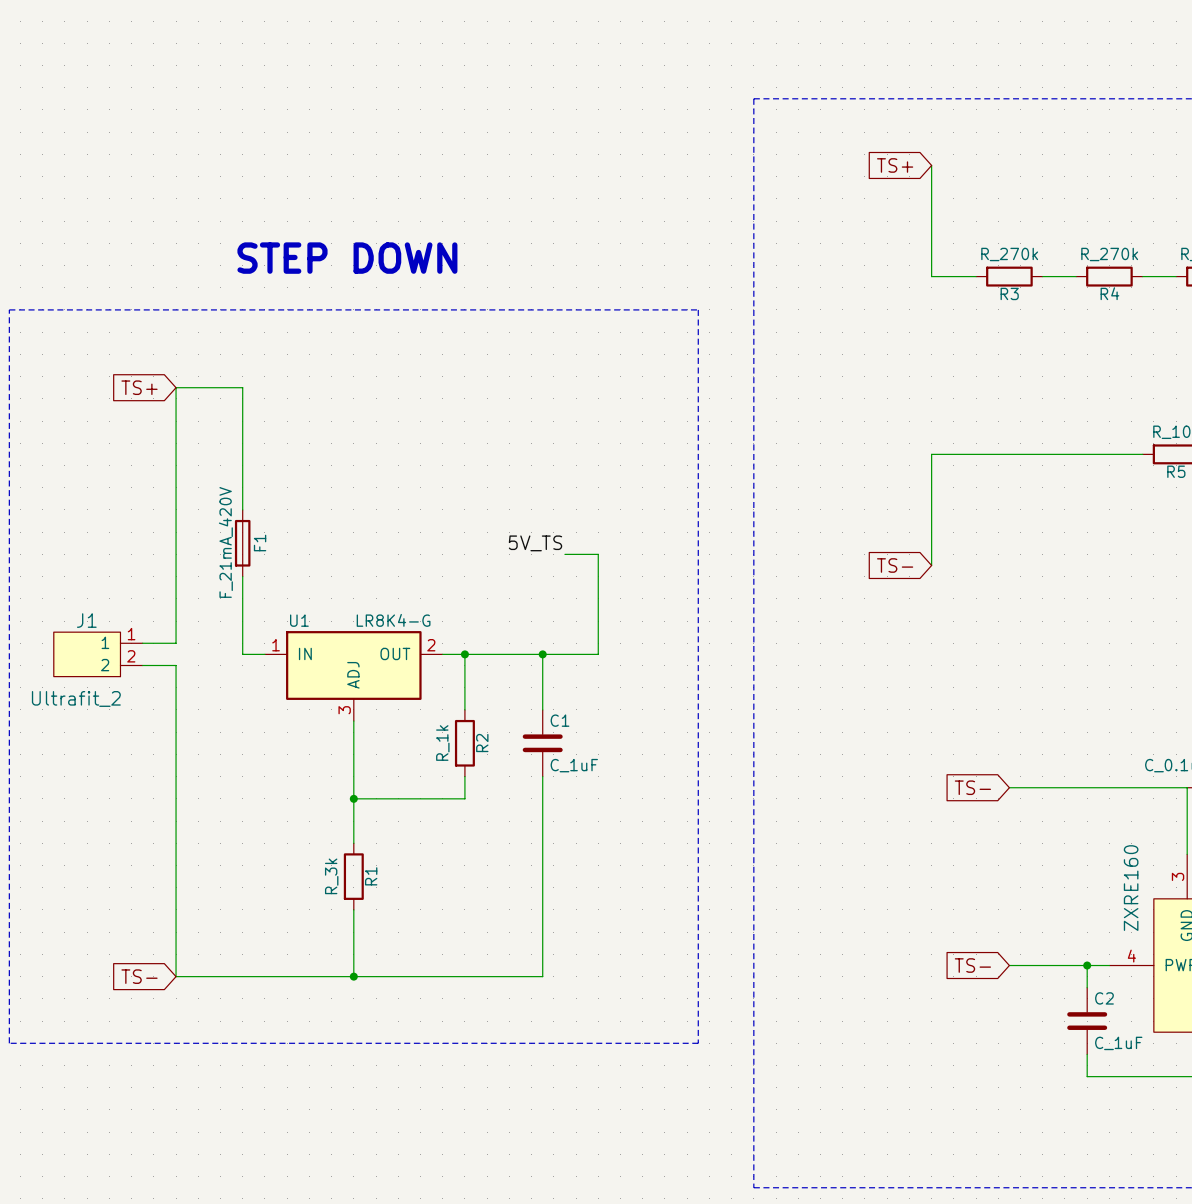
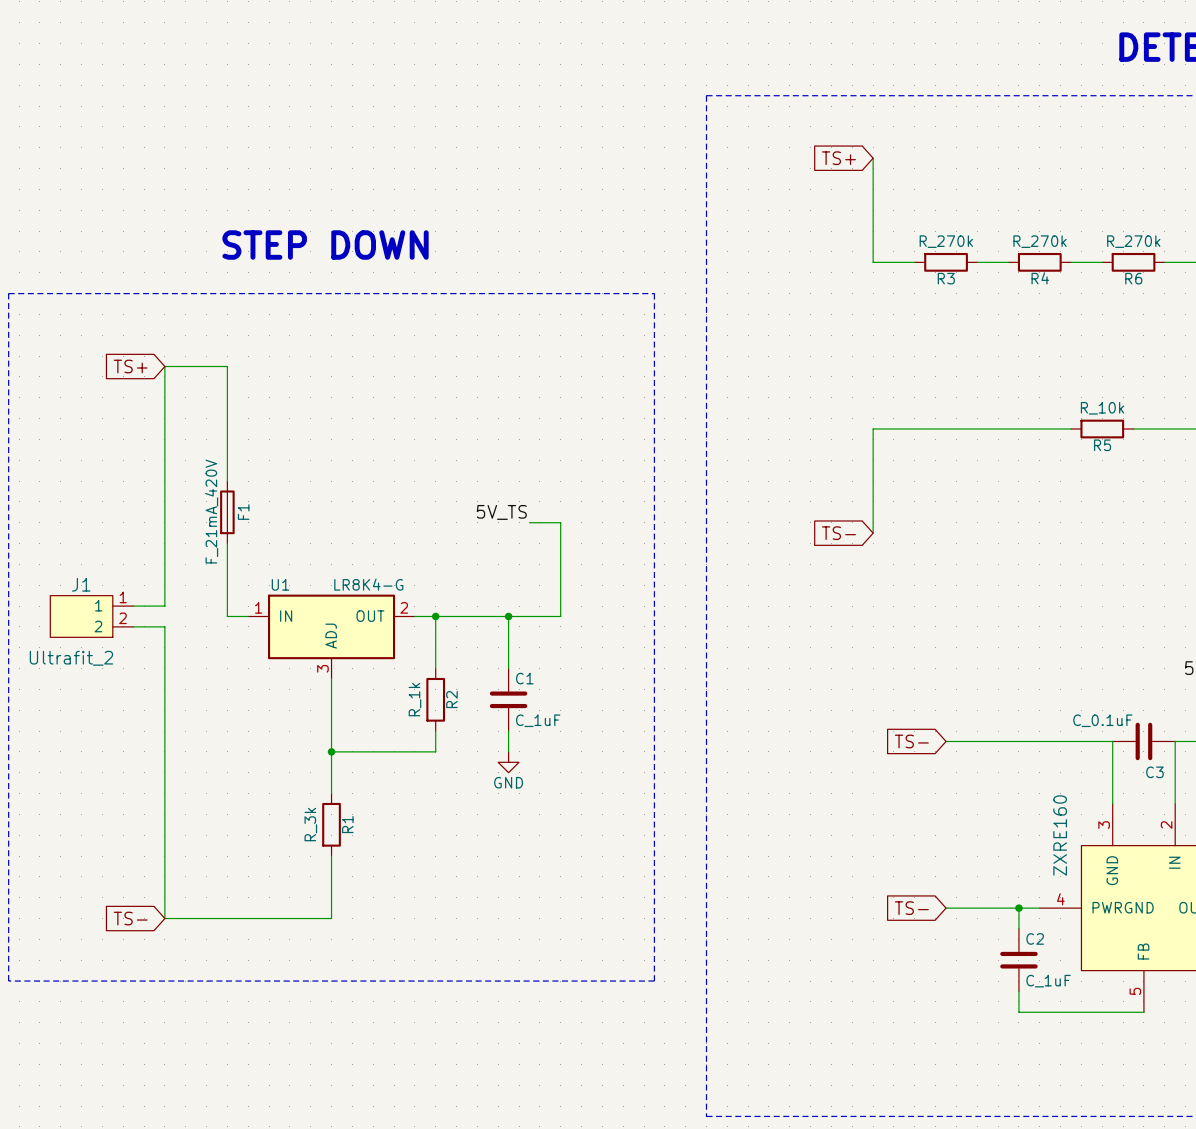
wire: (542, 798) (542, 976) (353, 976) -> none
power symbol: none -> GND (508, 762)
junction: (353, 976) -> none

